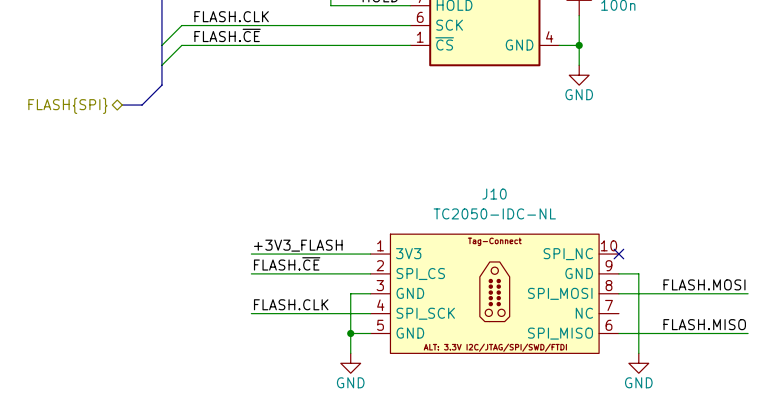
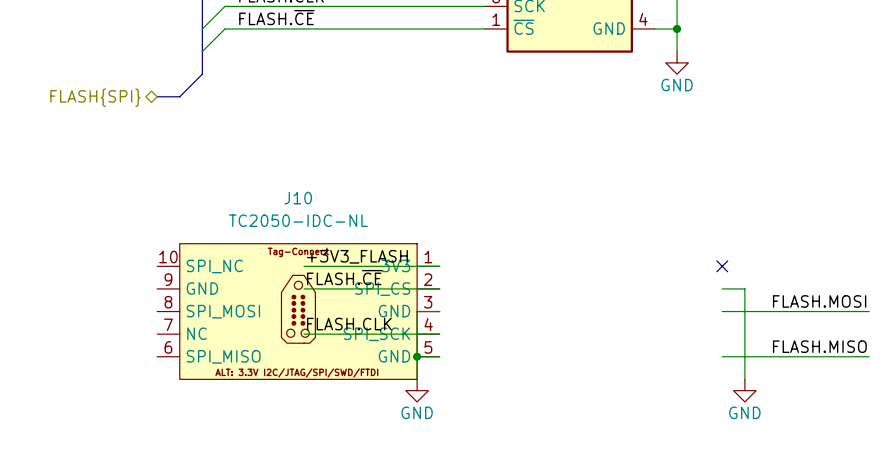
J10 flip: as is (494, 293) -> left-right (298, 311)
J10 position: (494, 293) -> (298, 311)

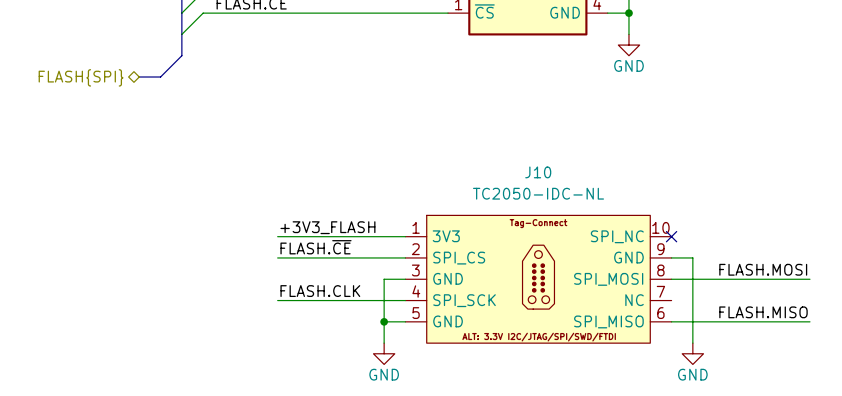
J10 flip: as is (298, 311) -> left-right (538, 279)
J10 position: (298, 311) -> (538, 279)

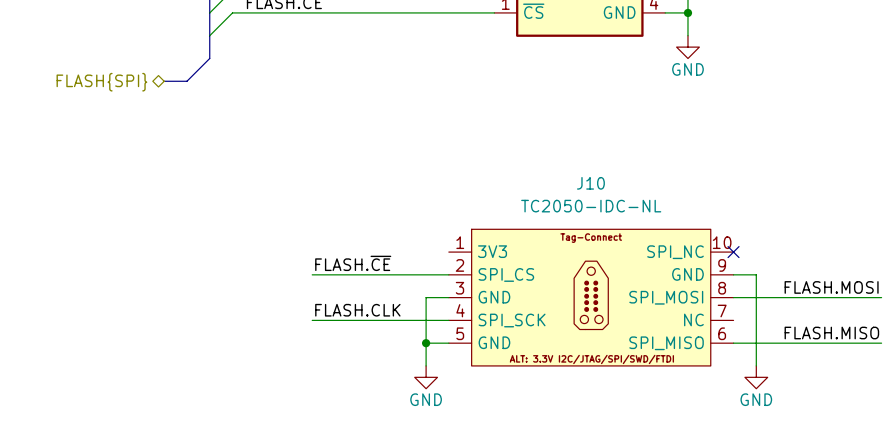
label: +3V3_FLASH (327, 227) -> none
wire: (277, 236) (405, 236) -> none

